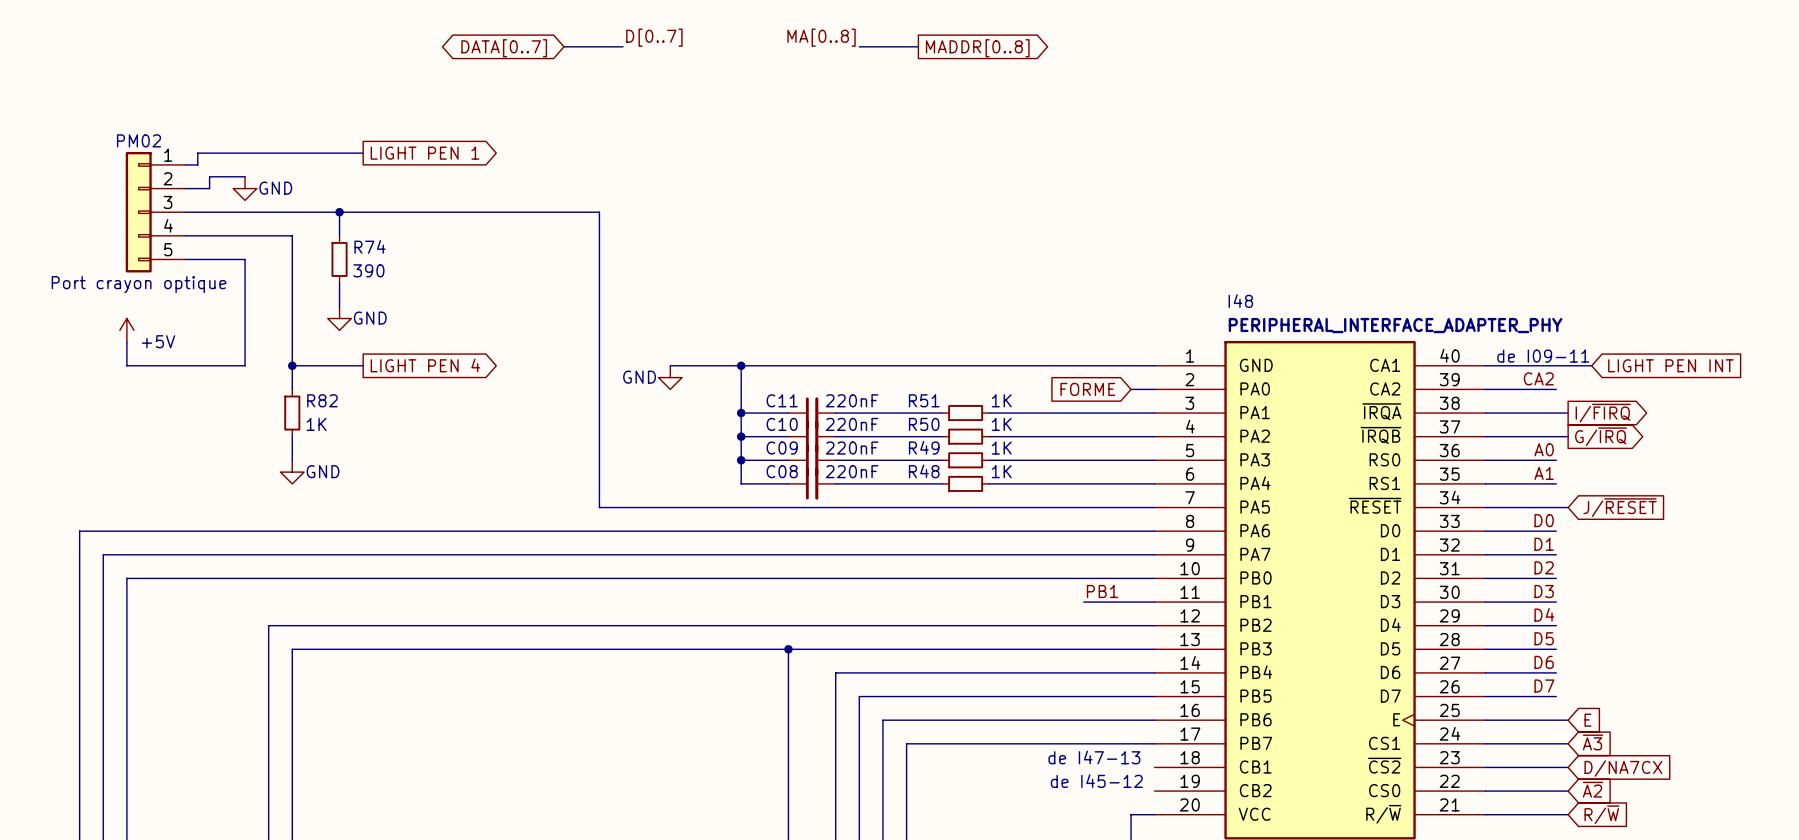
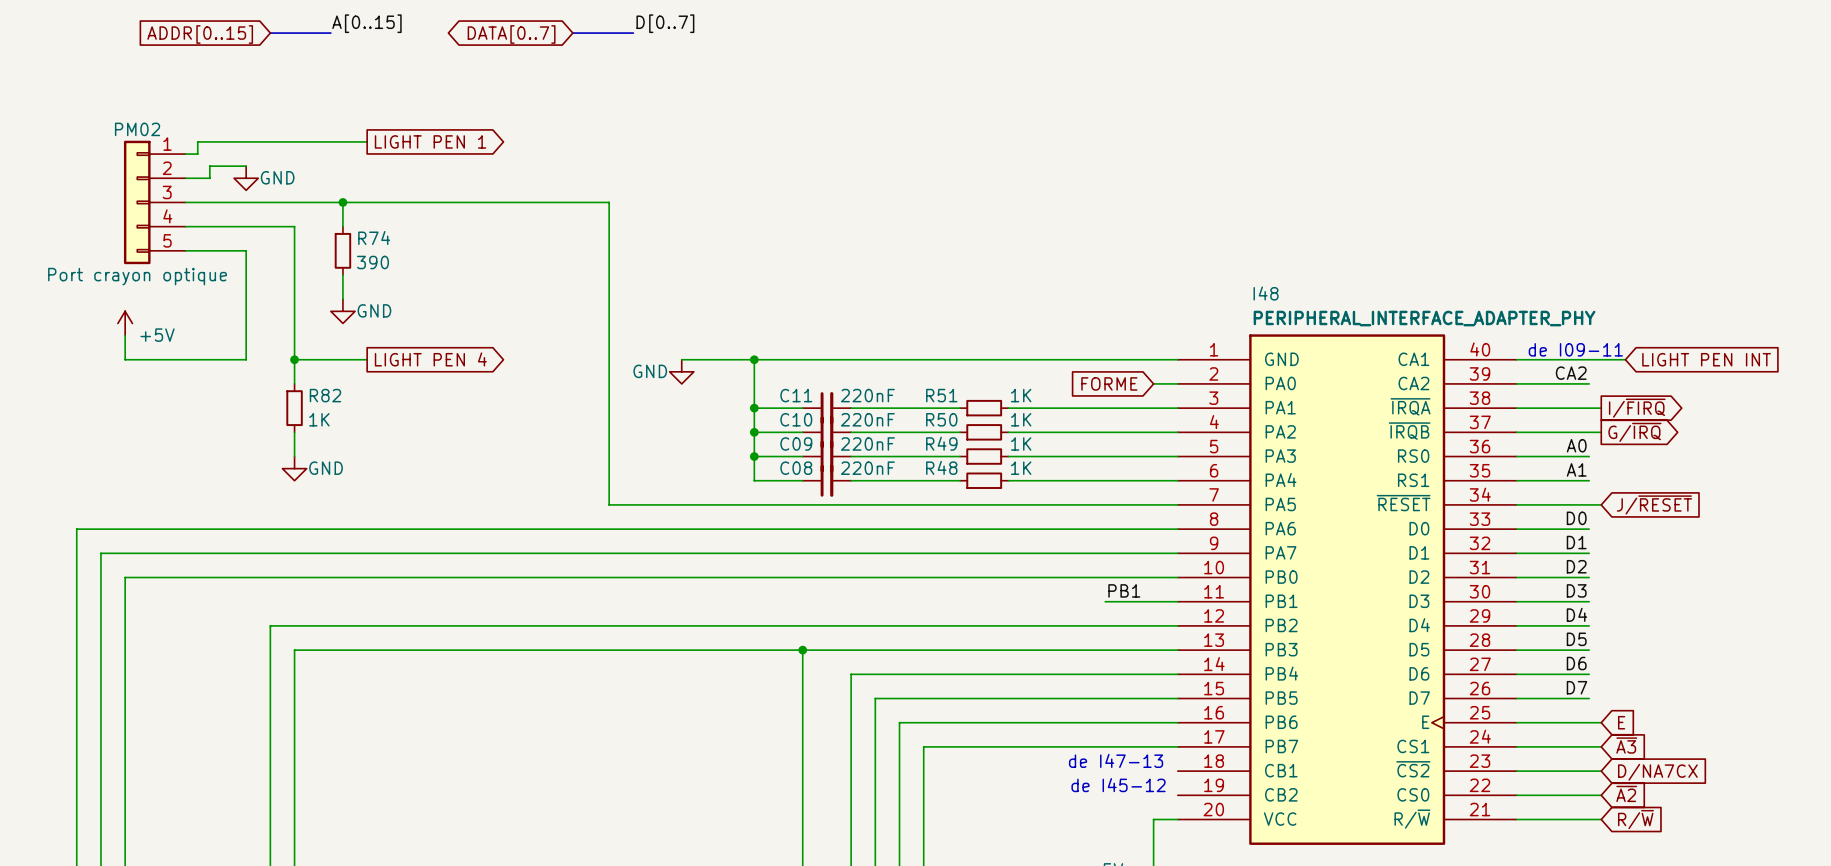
label: none -> A[0..15] (366, 23)
label: MA[0..8] (821, 37) -> none
bus: none -> (270, 33) (330, 33)
bus: (859, 46) (918, 46) -> none
global label: none -> ADDR[0..15] (200, 34)
global label: MADDR[0..8] (977, 48) -> none

